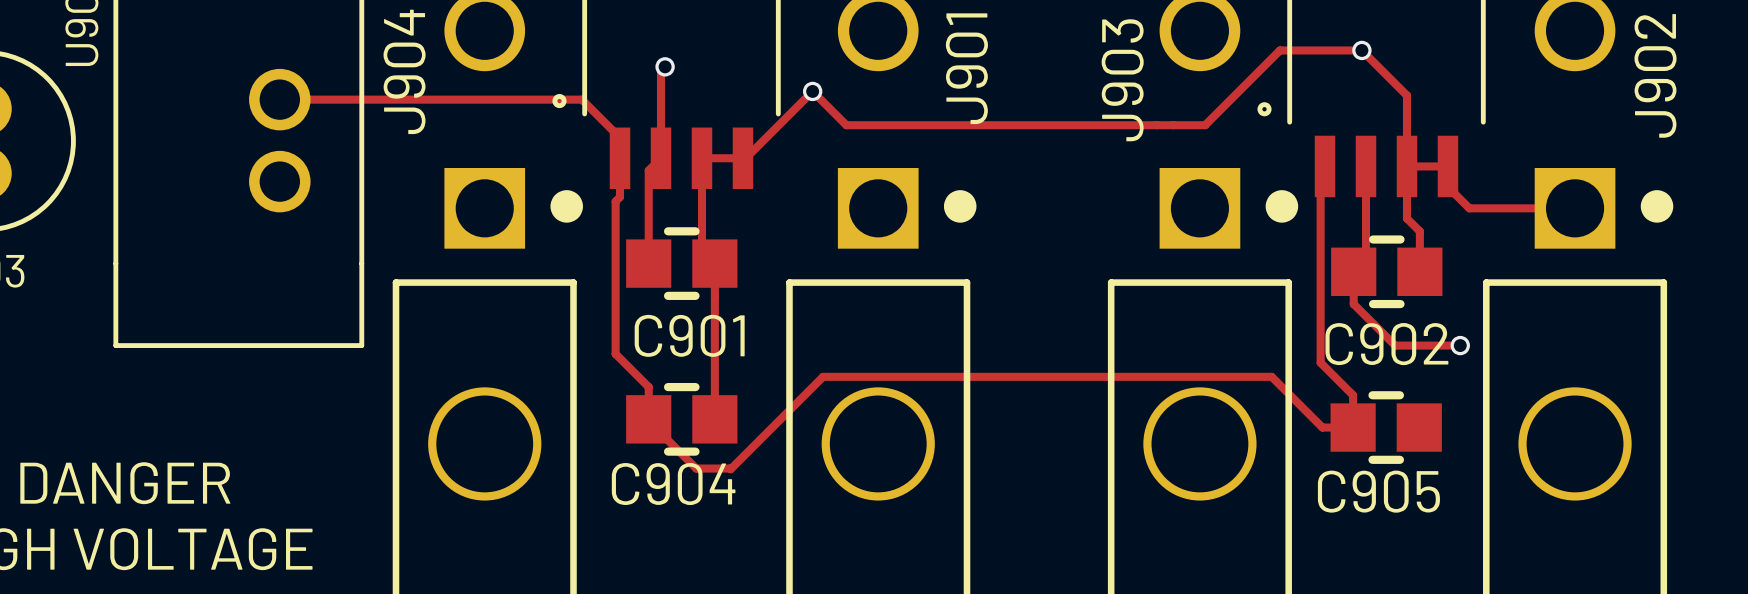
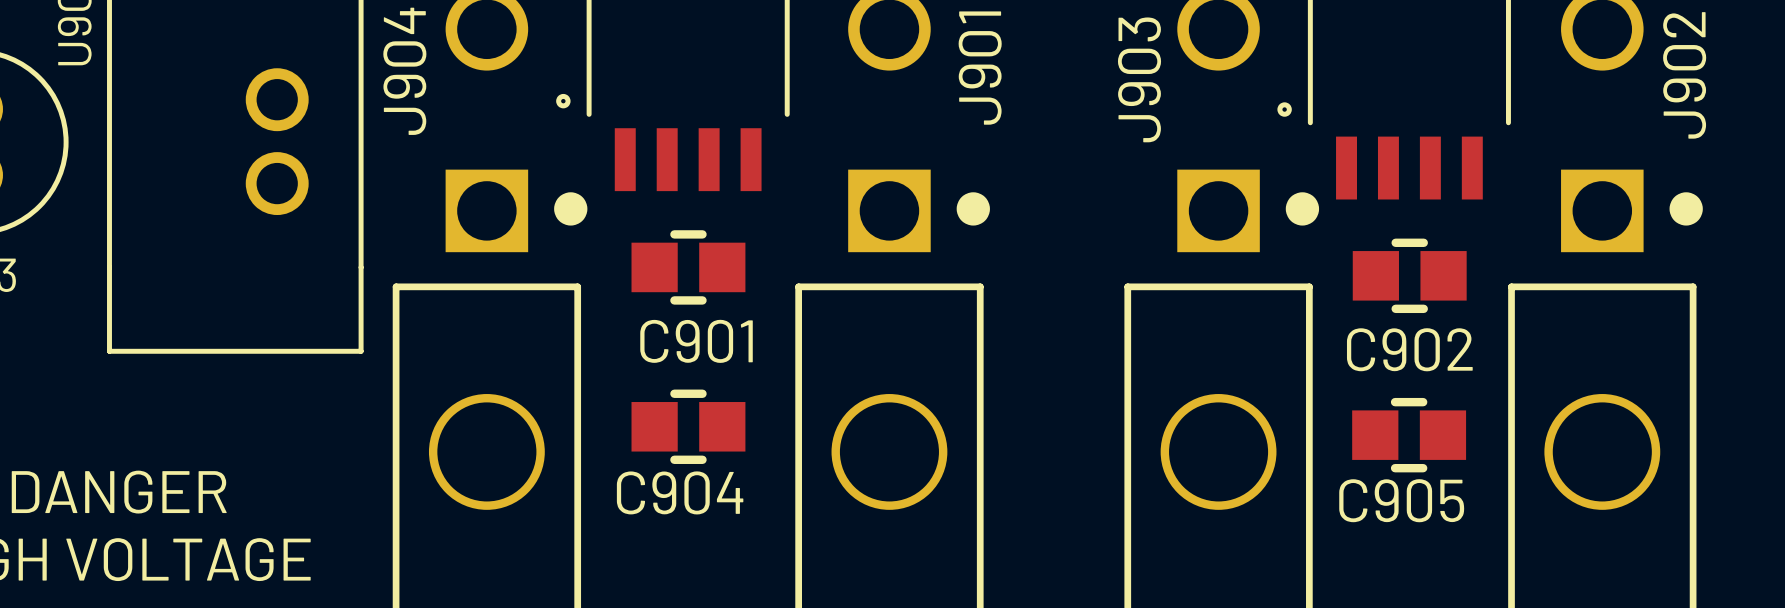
via: (1361, 50) -> none
track: (665, 66) (661, 70) (661, 158) (648, 170) (648, 263) -> none
via: (665, 66) -> none
via: (812, 91) -> none
track: (279, 99) (581, 99) (620, 137) (620, 197) (615, 201) (615, 353) (648, 387) (648, 420) (696, 468) (730, 469) (823, 376) (1271, 376) (1322, 427) (1353, 427) (1353, 395) (1320, 362) (1320, 191) (1325, 186) (1325, 166) -> none
track: (1366, 166) (1366, 259) (1353, 271) (1353, 304) (1395, 345) (1460, 345) -> none
track: (1406, 166) (1447, 166) (1447, 186) (1469, 208) (1575, 208) -> none
track: (1419, 271) (1419, 231) (1406, 218) (1406, 95) (1361, 50) (1279, 50) (1205, 125) (846, 125) (812, 91) (745, 158) (701, 158) (701, 250) (714, 263) (714, 419) -> none
via: (1460, 345) -> none

